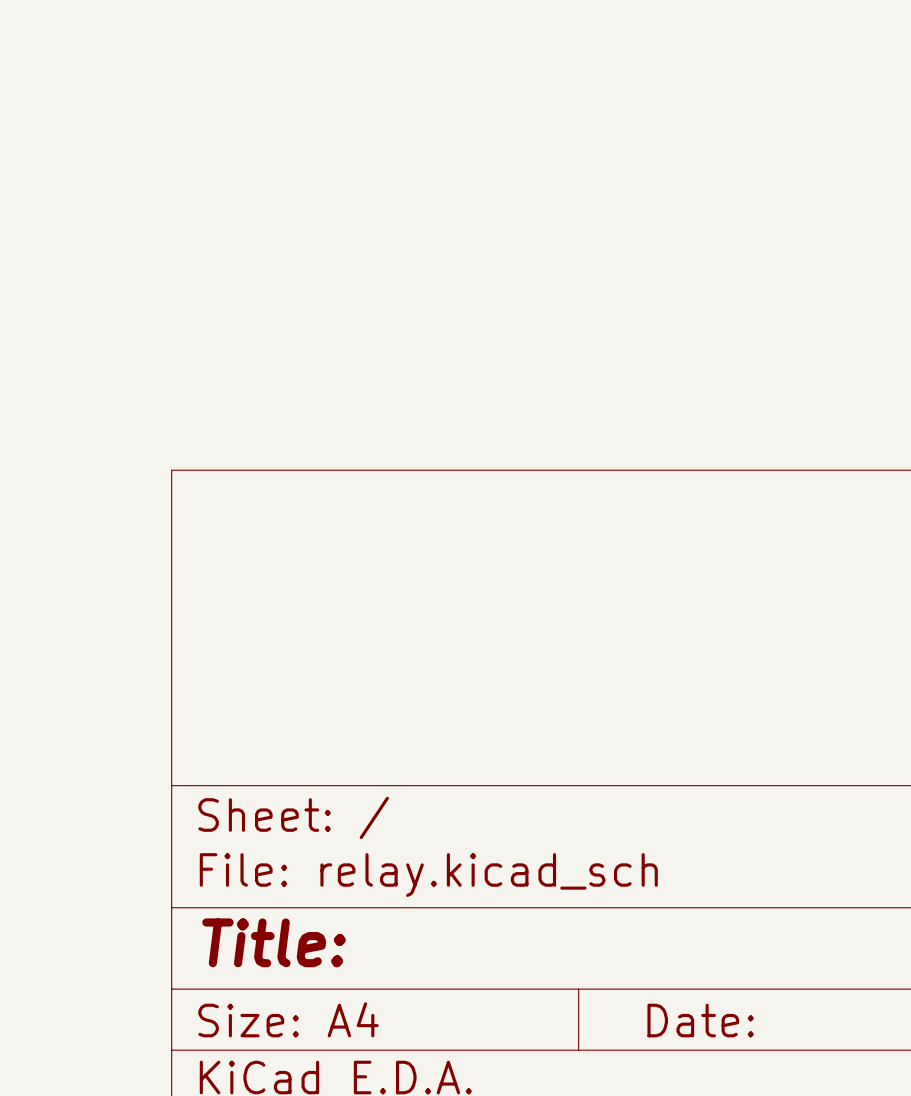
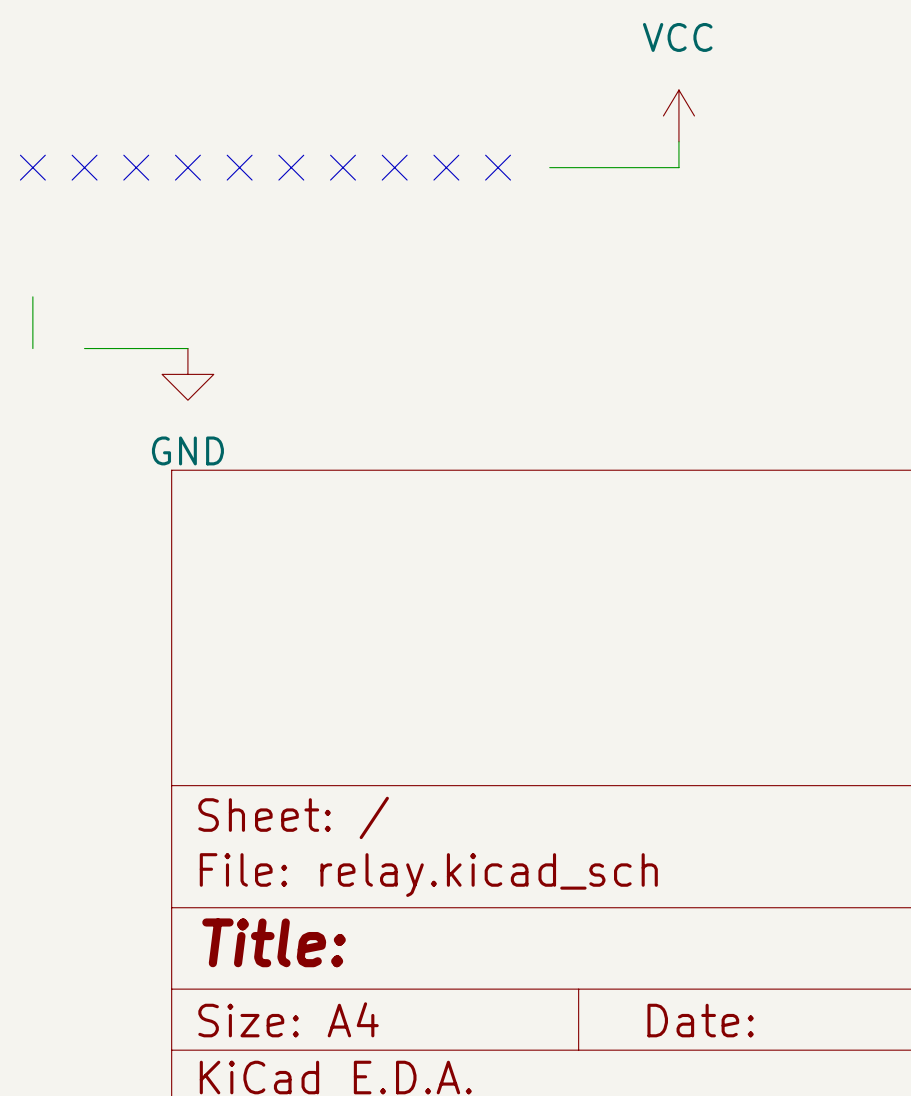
power symbol: none -> VCC (678, 115)
wire: none -> (678, 141) (678, 167) (549, 167)
no-connect mark: none -> (32, 167)
no-connect mark: none -> (84, 167)
no-connect mark: none -> (136, 167)
no-connect mark: none -> (187, 167)
no-connect mark: none -> (239, 167)
no-connect mark: none -> (291, 167)
no-connect mark: none -> (343, 167)
no-connect mark: none -> (394, 167)
no-connect mark: none -> (446, 167)
no-connect mark: none -> (498, 167)
wire: none -> (32, 296) (32, 348)
wire: none -> (84, 348) (187, 348)
power symbol: none -> GND (187, 374)

